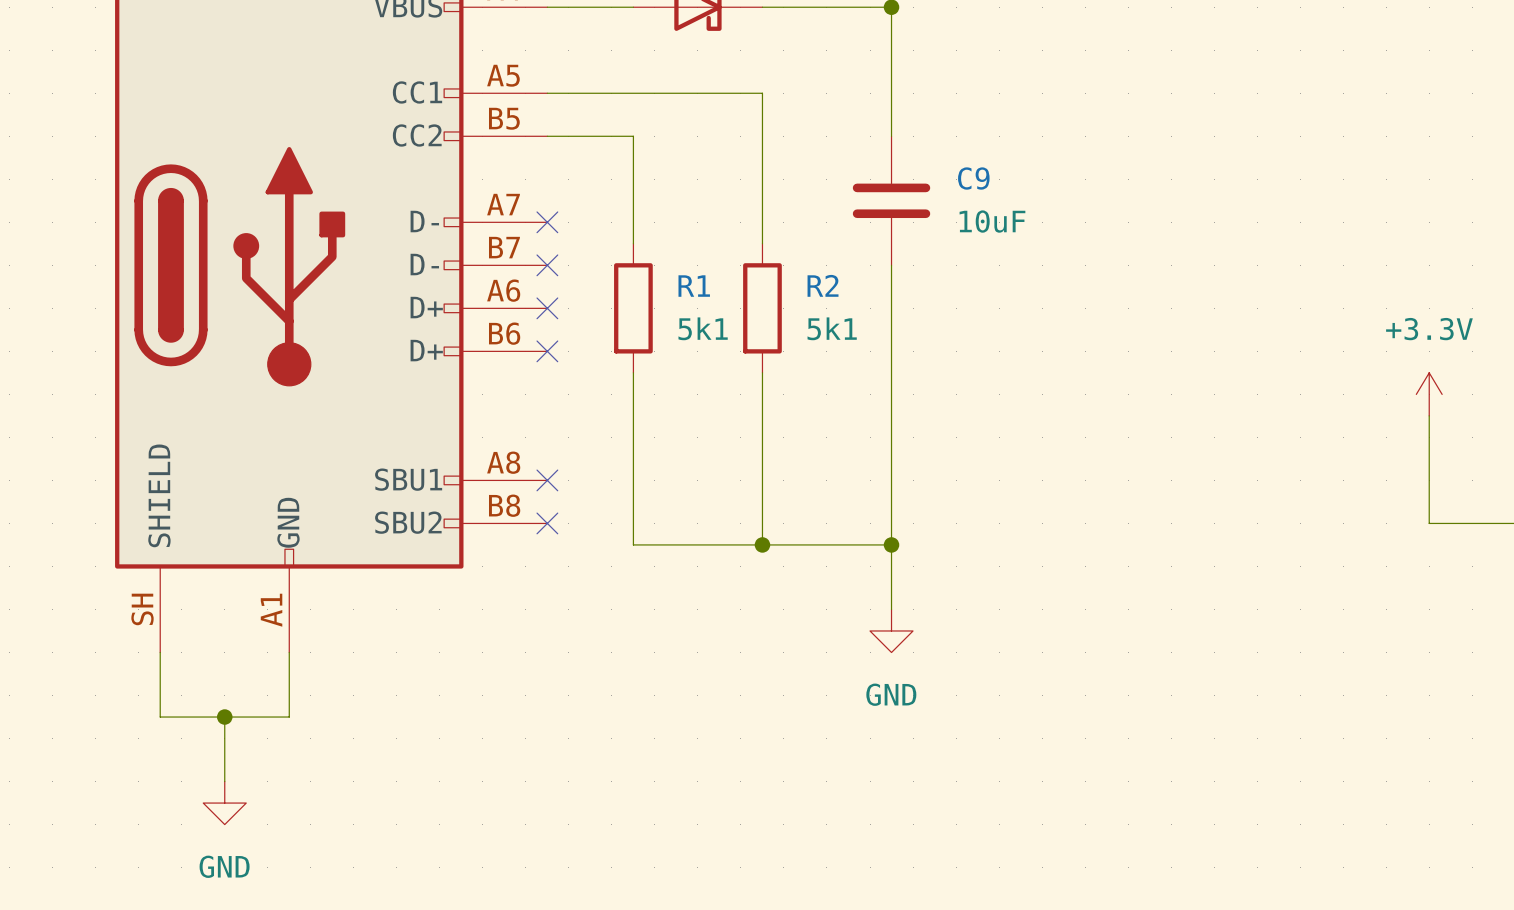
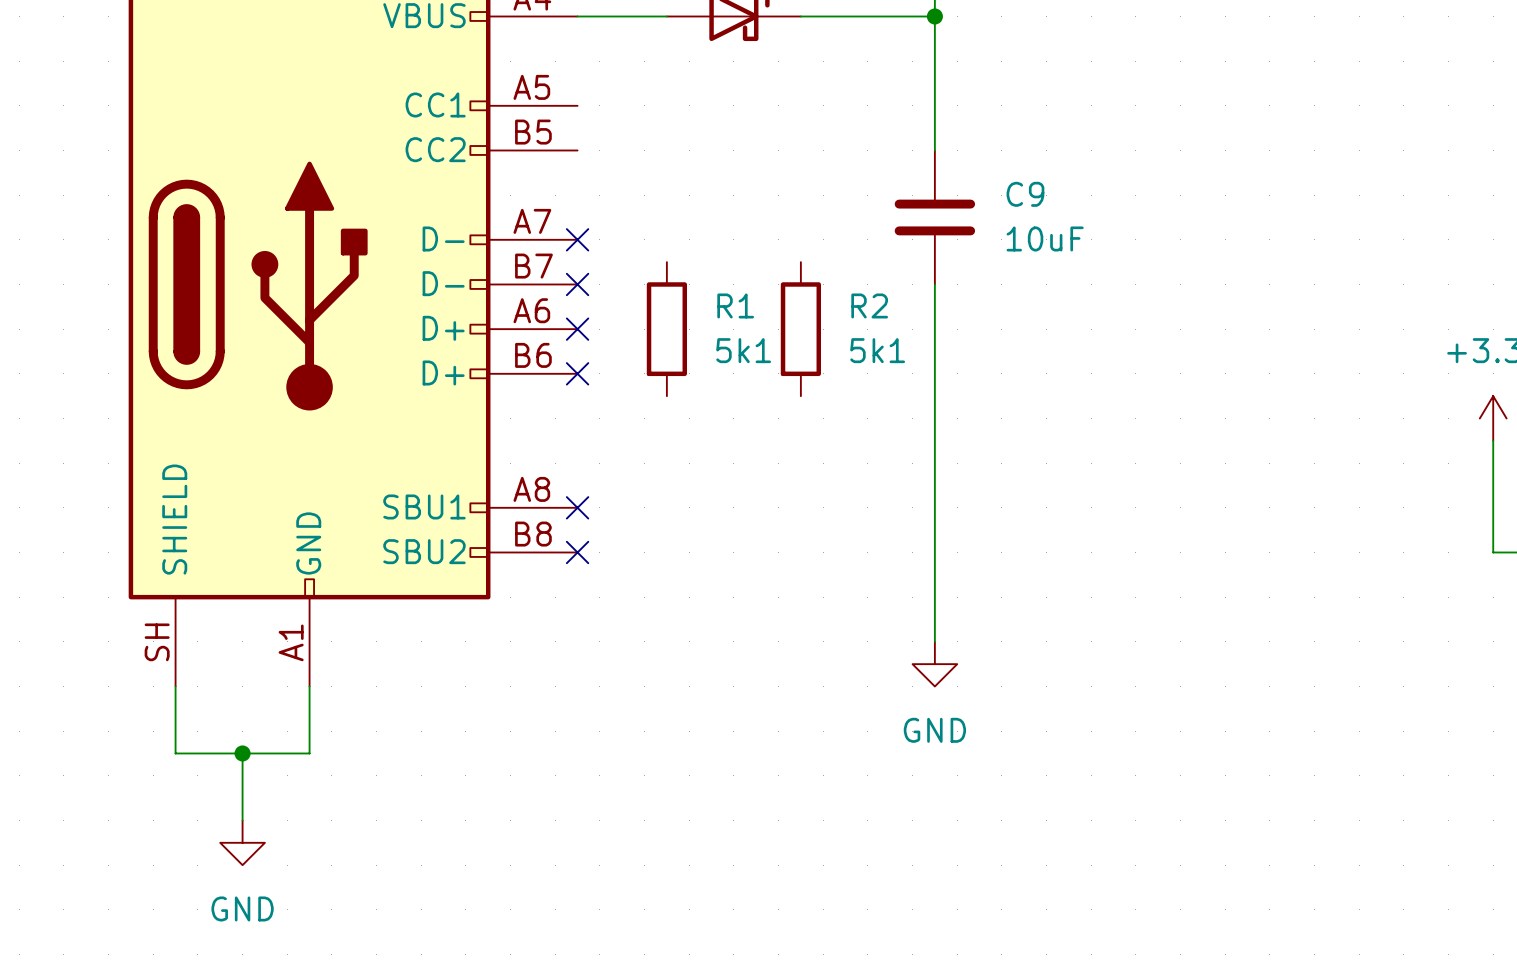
wire: (547, 93) (762, 93) (762, 243) -> none
wire: (547, 136) (633, 136) (633, 243) -> none
wire: (633, 372) (633, 544) (891, 544) -> none
wire: (762, 372) (762, 544) -> none
junction: (762, 544) -> none
junction: (891, 544) -> none

